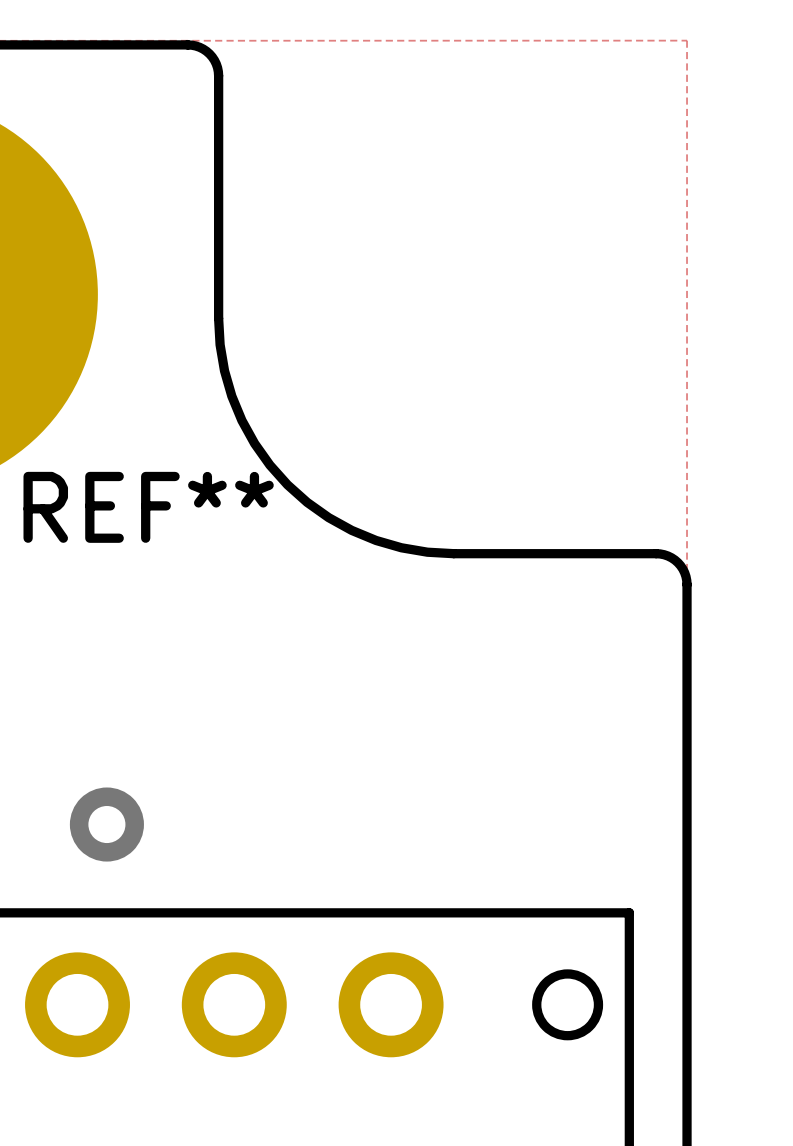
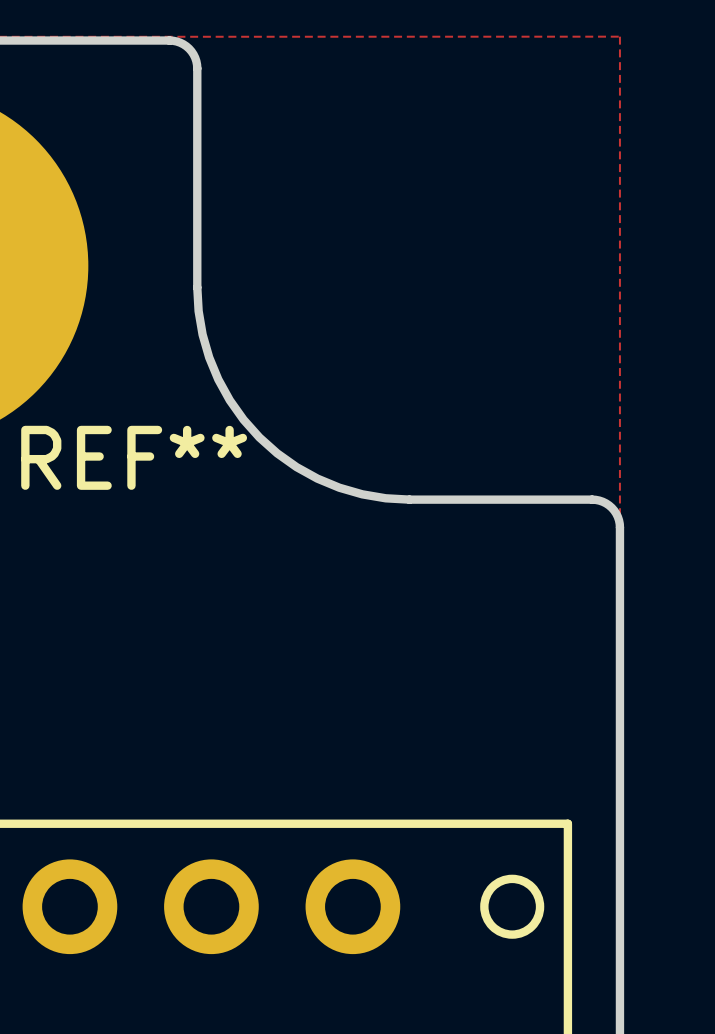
via: (106, 824) -> none

